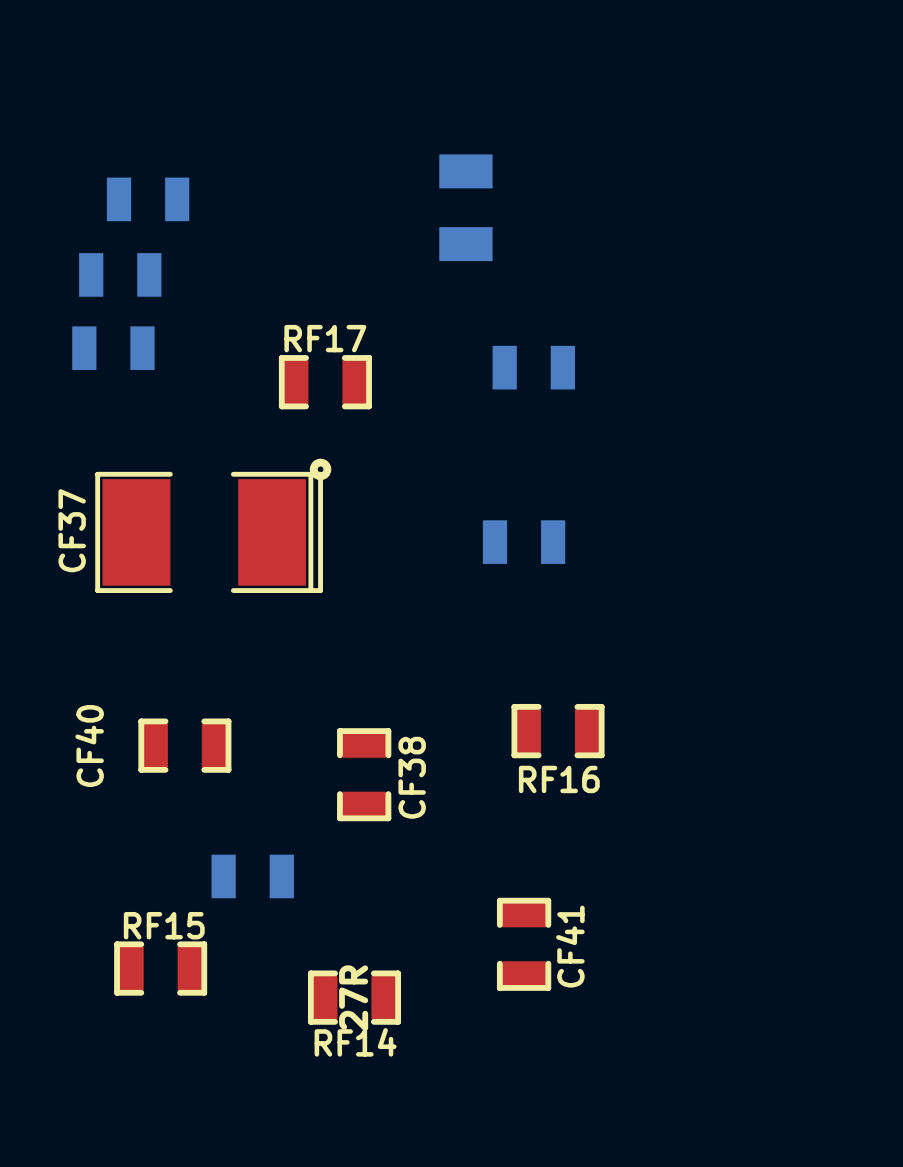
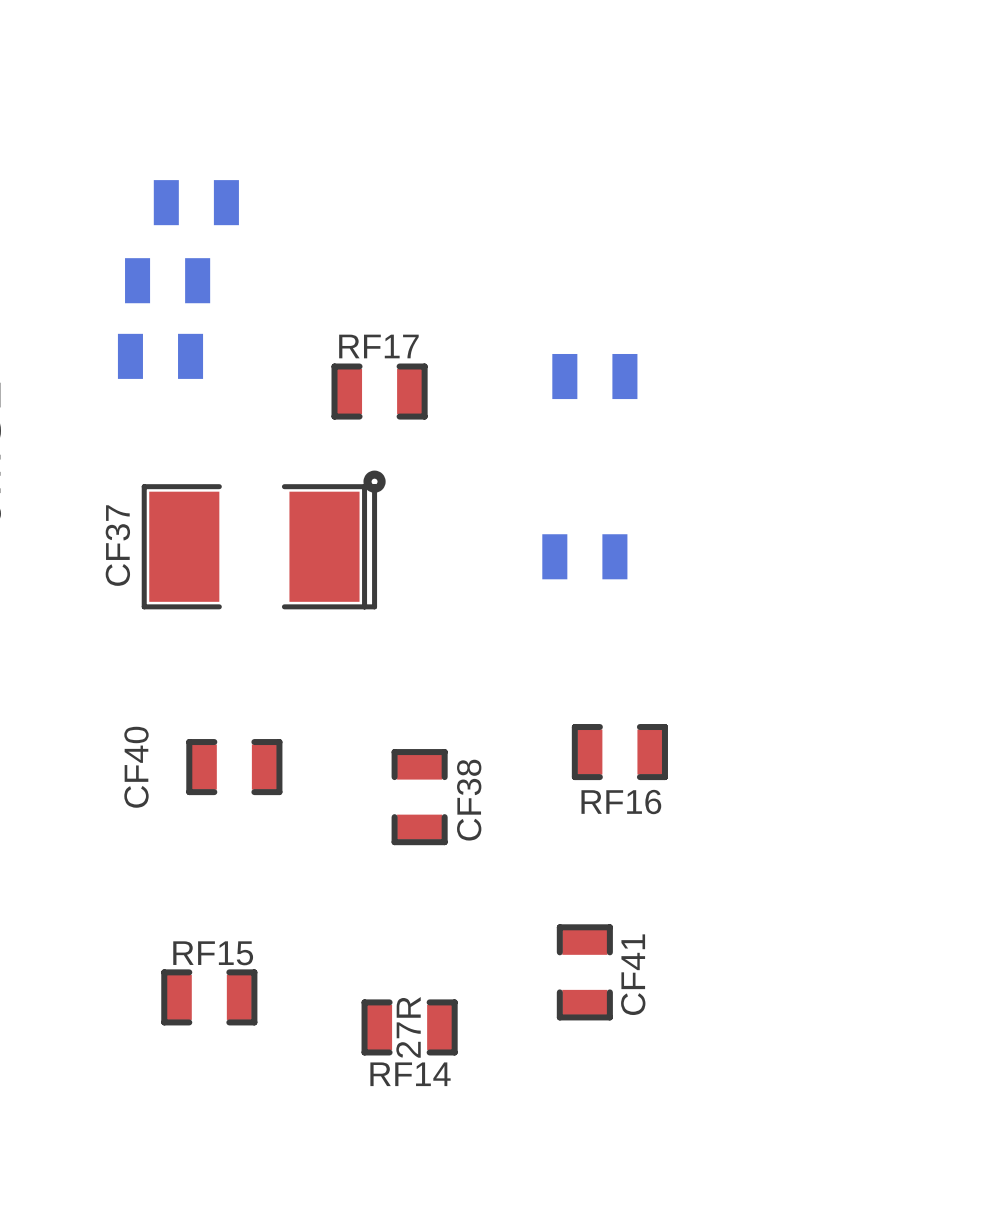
part: (465, 207) -> none
part: (252, 876) -> none

